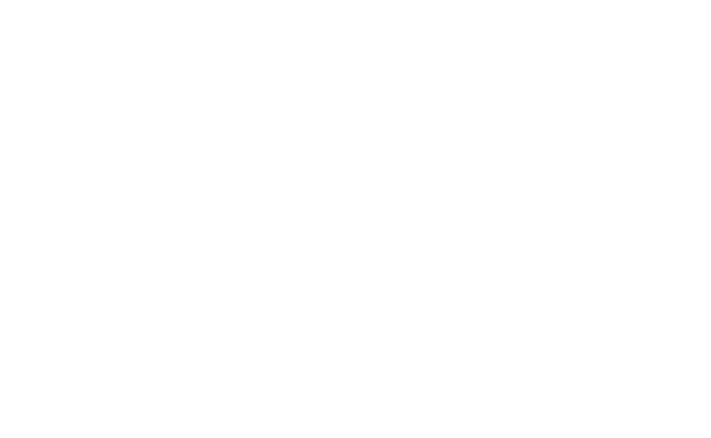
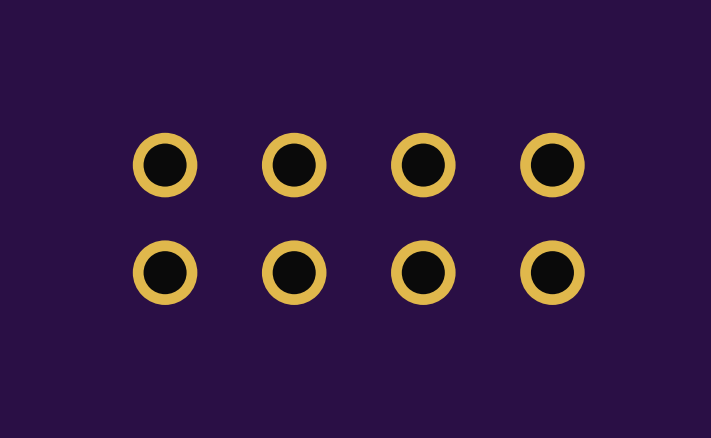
part: none -> (165, 218)
part: none -> (294, 218)
part: none -> (423, 218)
part: none -> (552, 218)

